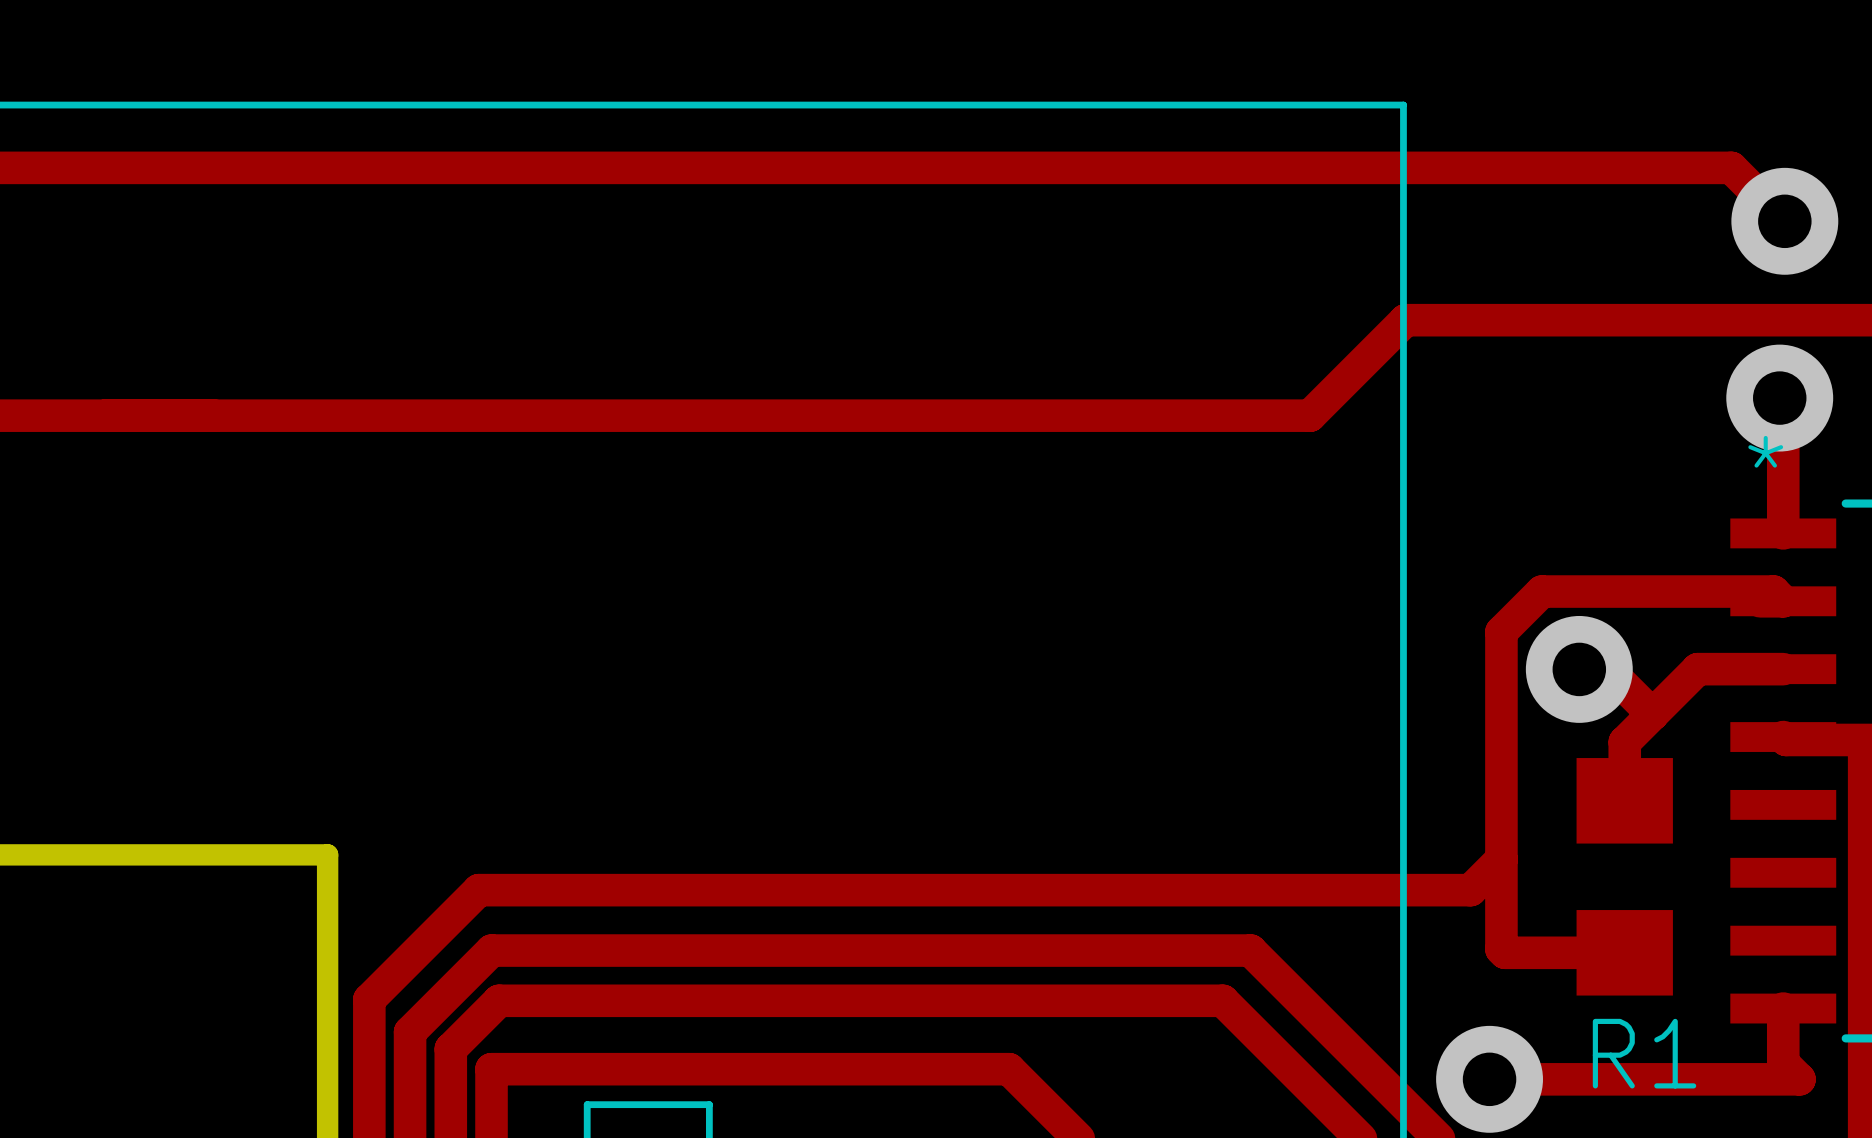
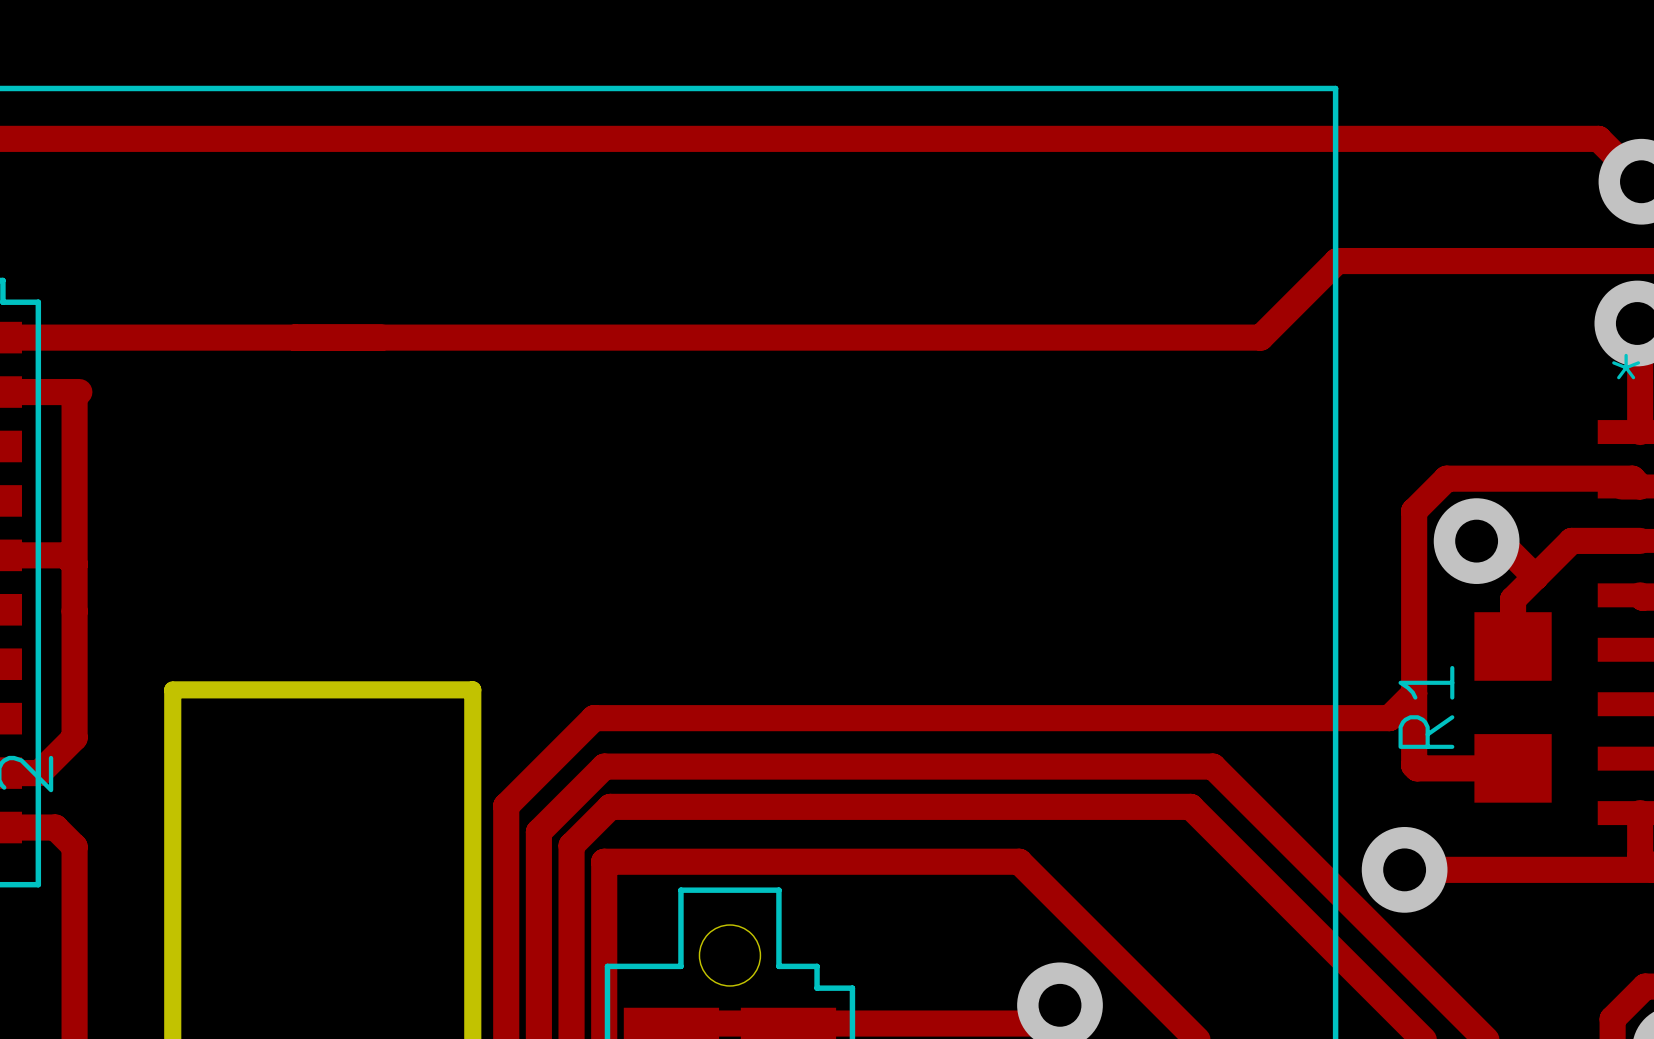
R1 name rotation: 0° (1644, 1053) -> 90° counterclockwise (1426, 707)
R1 name position: R1 (1644, 1053) -> R1 (1426, 707)

